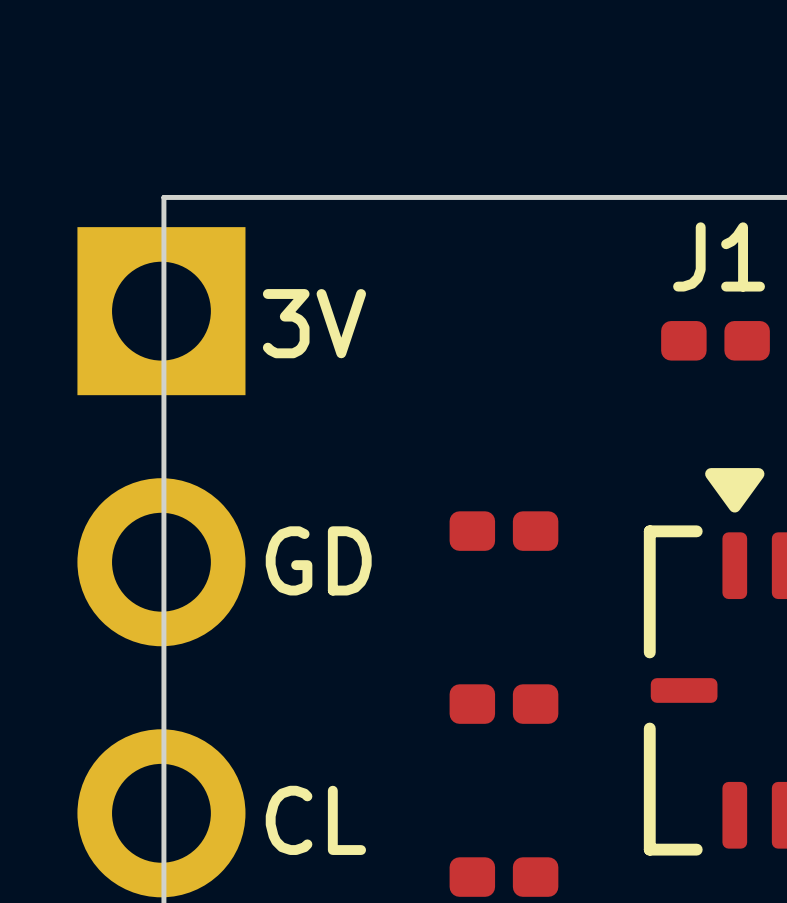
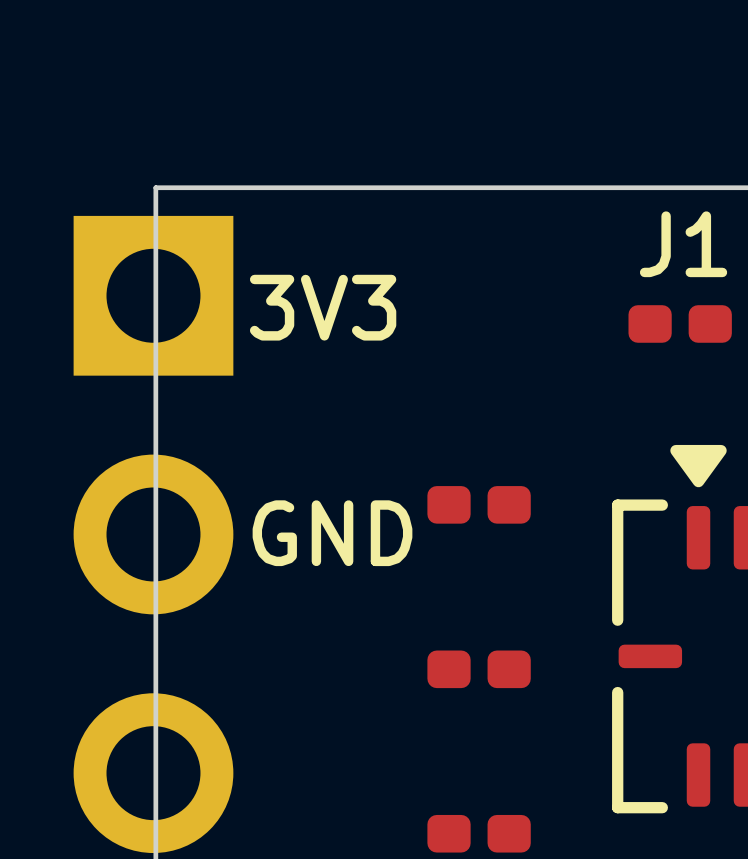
text: 3V (314, 323) -> 3V3 (323, 307)
text: GD (318, 560) -> GND (332, 533)
text: CL (315, 820) -> none

